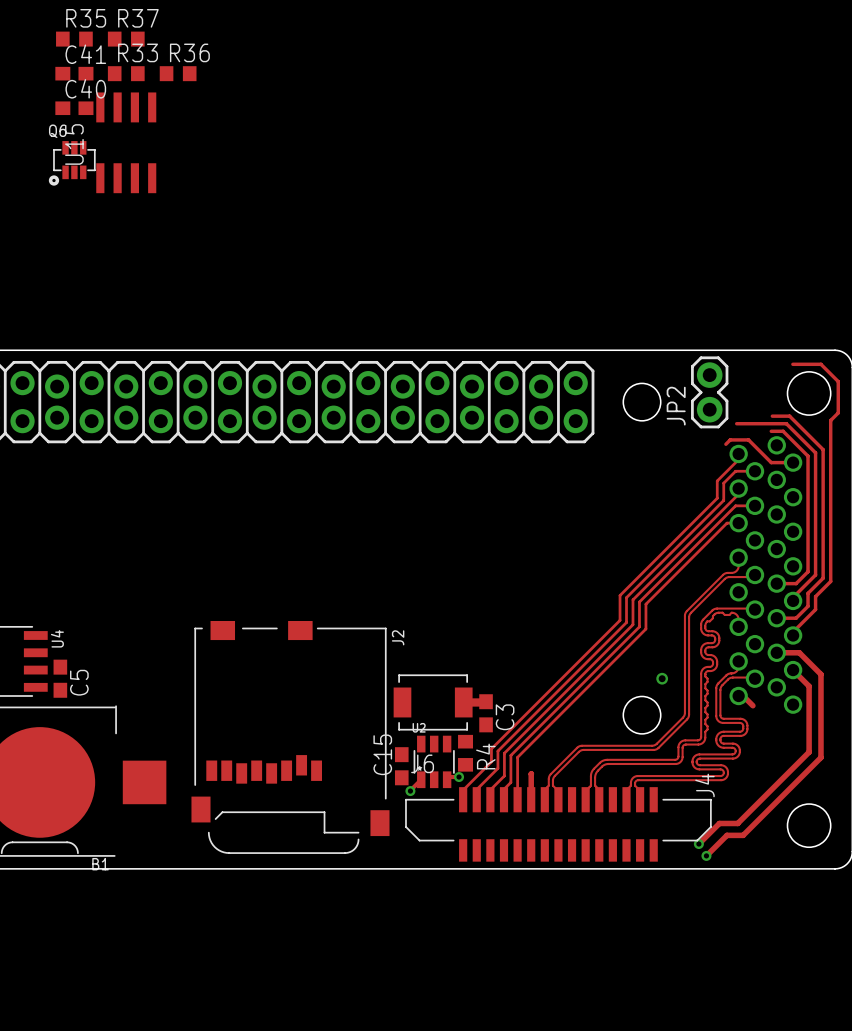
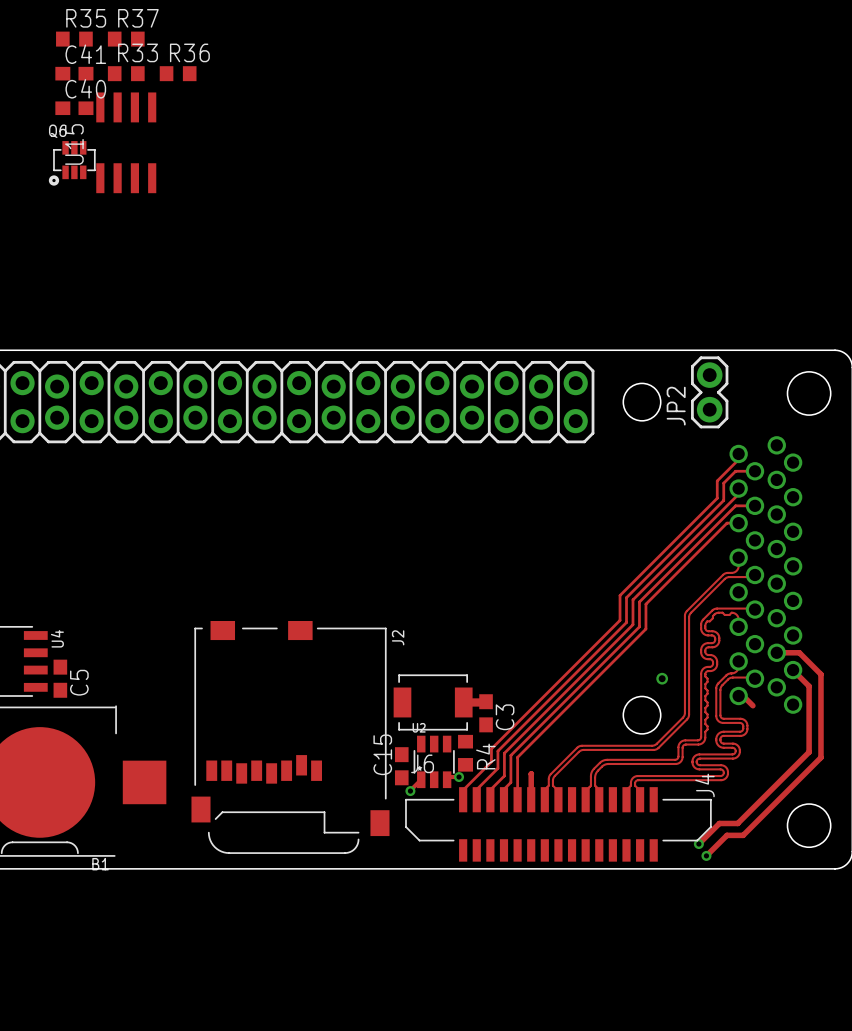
track: (792, 364) (820, 364) (838, 381) (838, 412) (830, 420) (830, 581) (815, 596) (815, 609) (793, 632) (793, 635) -> none
track: (772, 416) (789, 416) (823, 449) (823, 578) (808, 593) (808, 606) (796, 618) (776, 618) -> none
track: (736, 423) (786, 423) (815, 452) (815, 574) (793, 597) (793, 600) -> none
track: (771, 431) (783, 431) (808, 456) (808, 571) (796, 583) (776, 583) -> none
track: (725, 444) (730, 439) (748, 439) (771, 462) (793, 462) -> none

